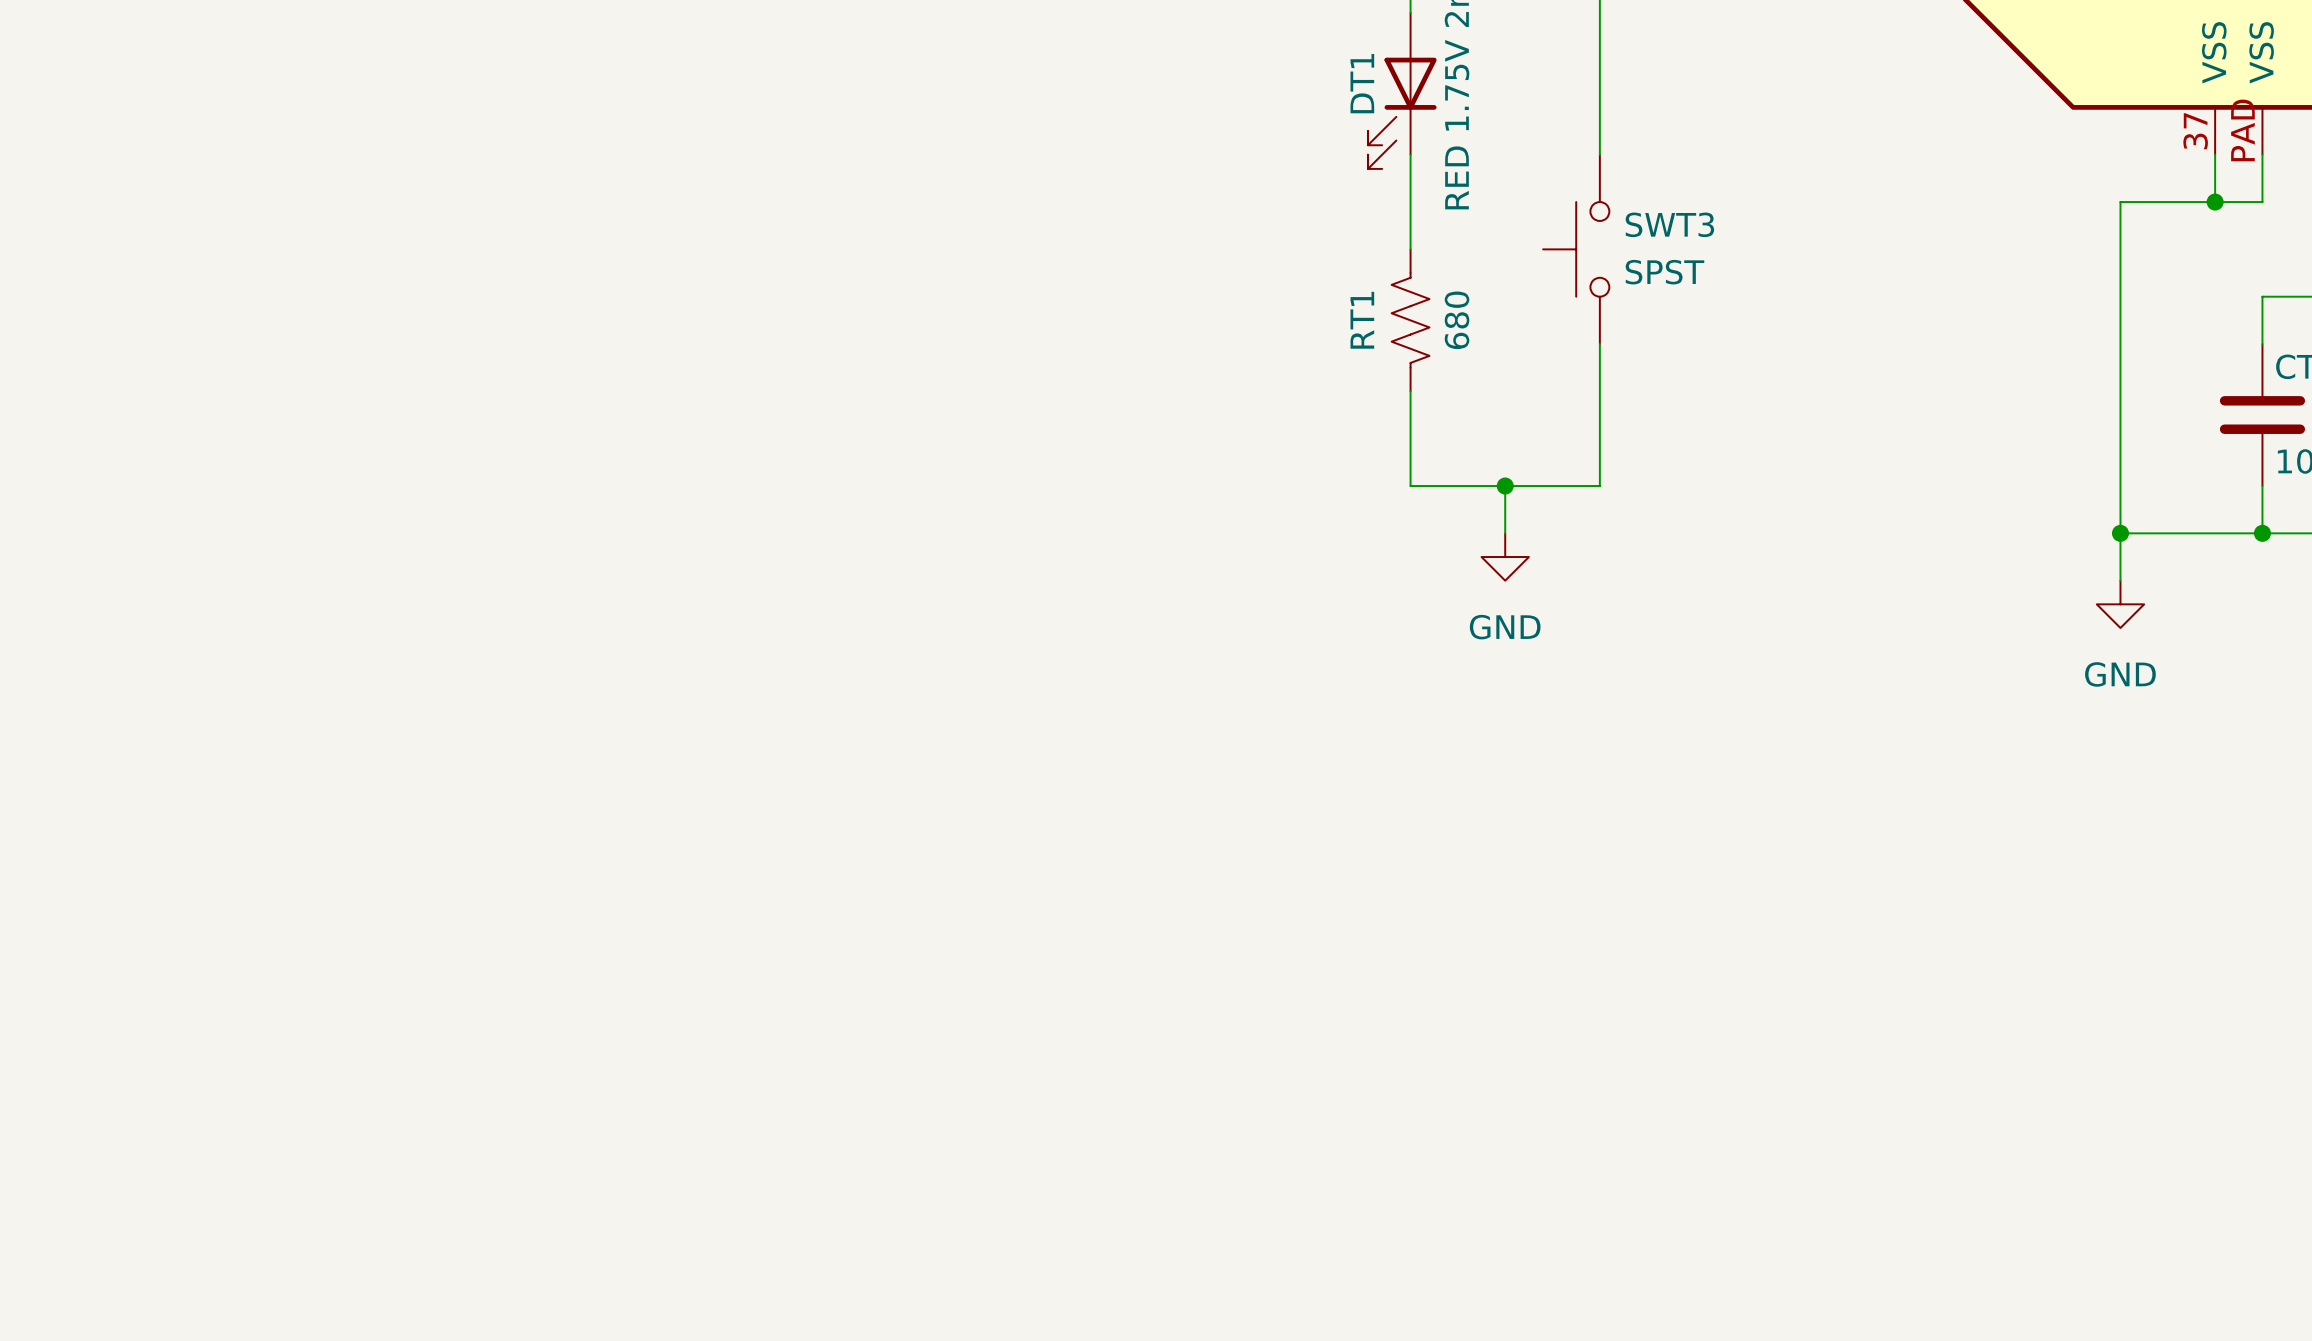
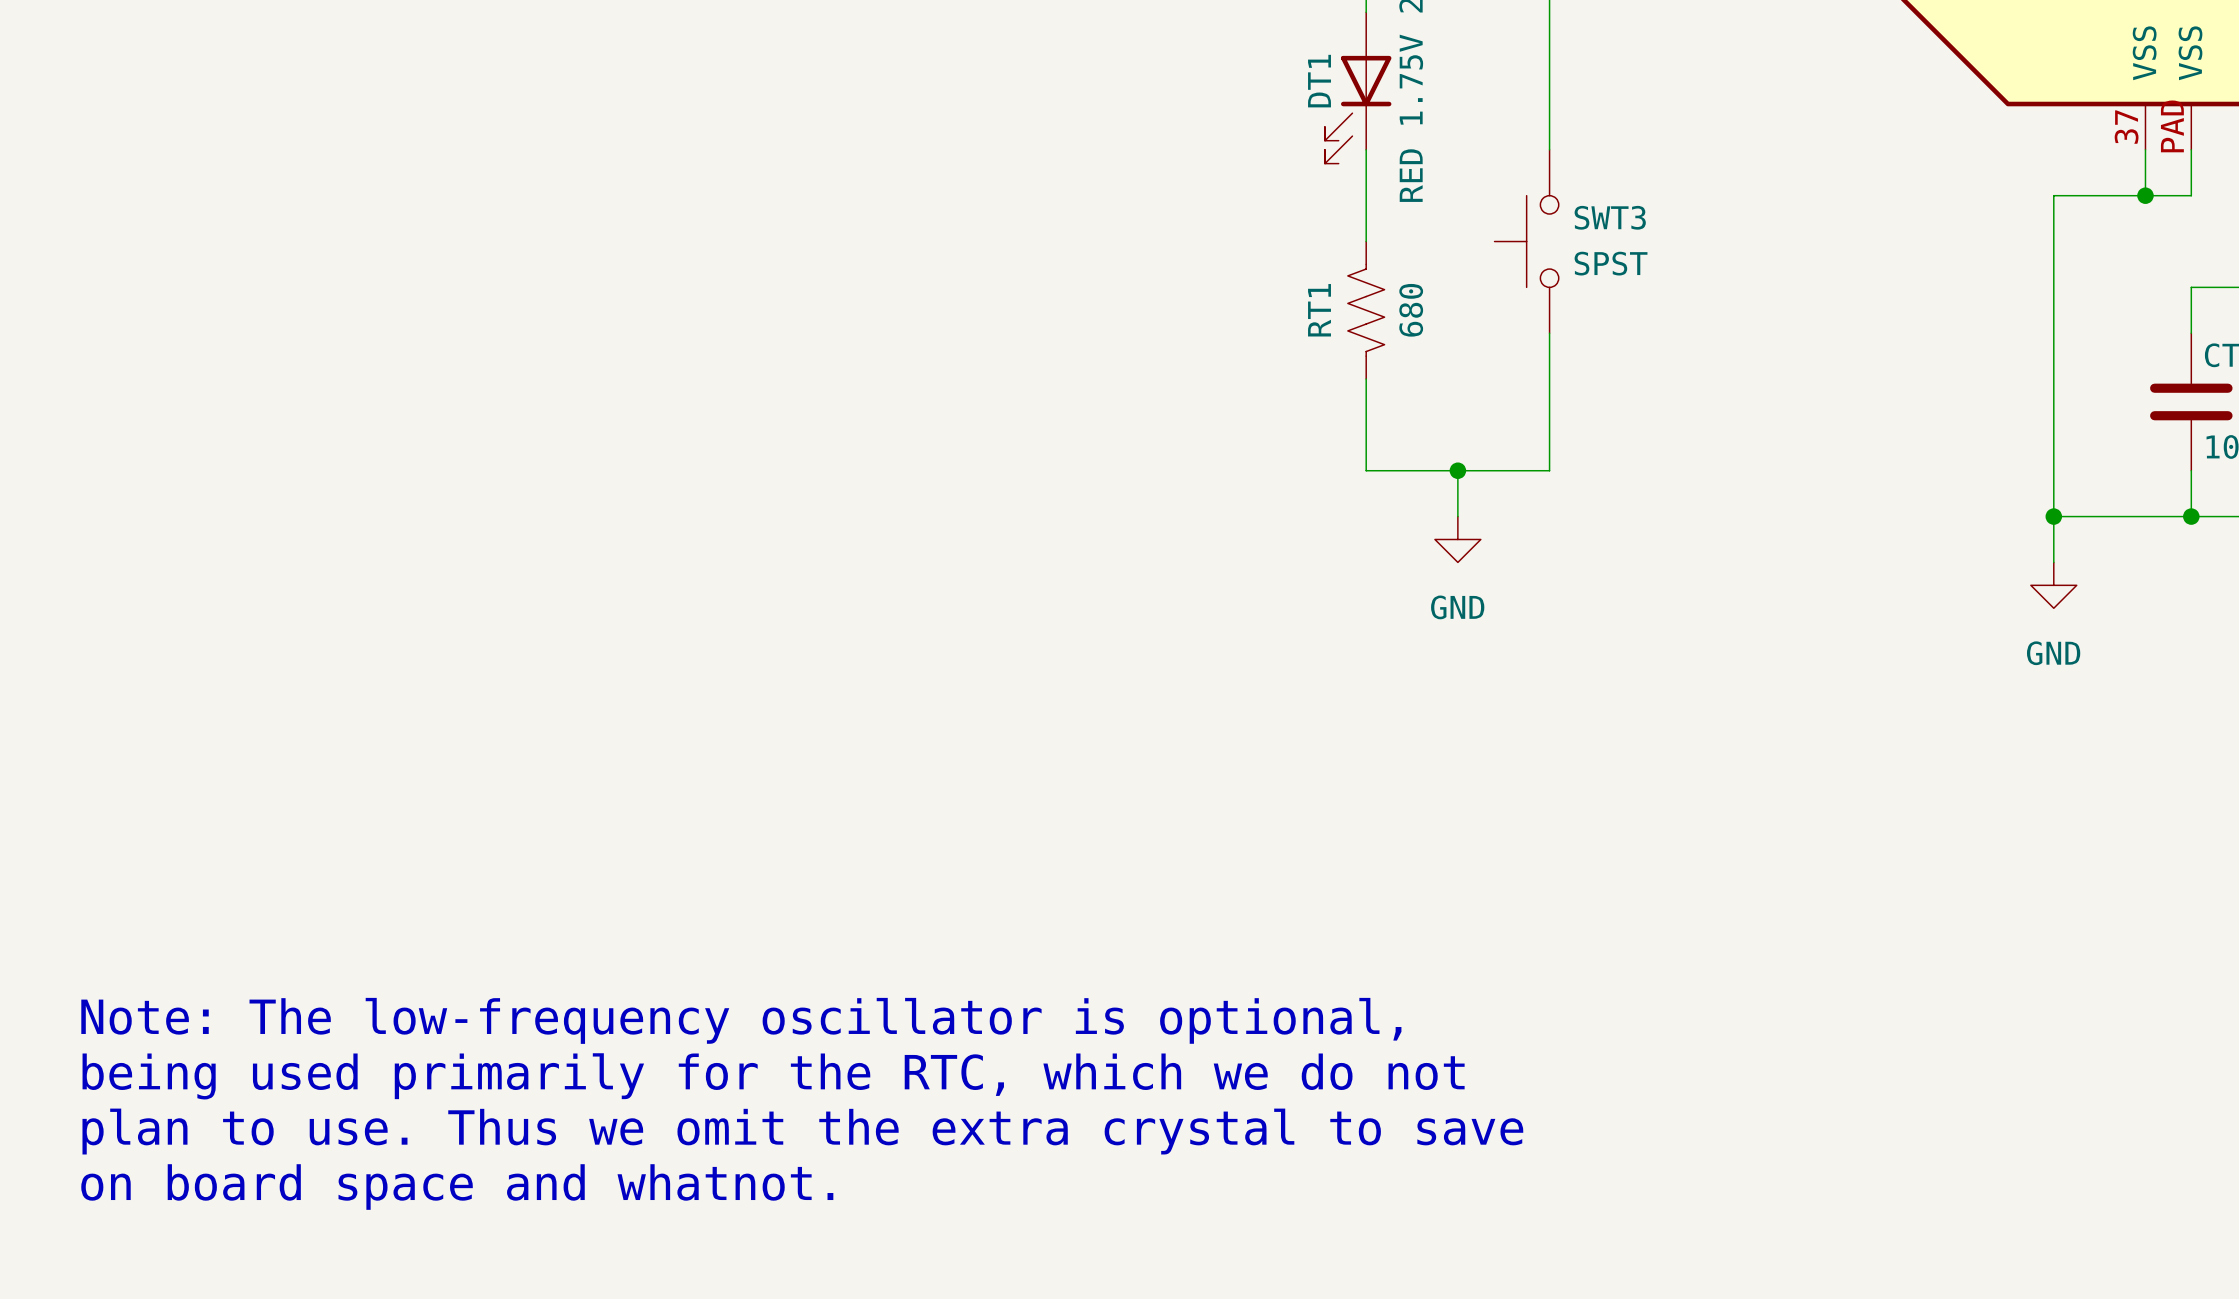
text: none -> Note: The low-frequency oscillator is optional, (741, 1020)
text: none -> being used primarily for the RTC, which we do not (773, 1076)
text: none -> plan to use. Thus we omit the extra crystal to save (802, 1131)
text: none -> on board space and whatnot. (457, 1187)

